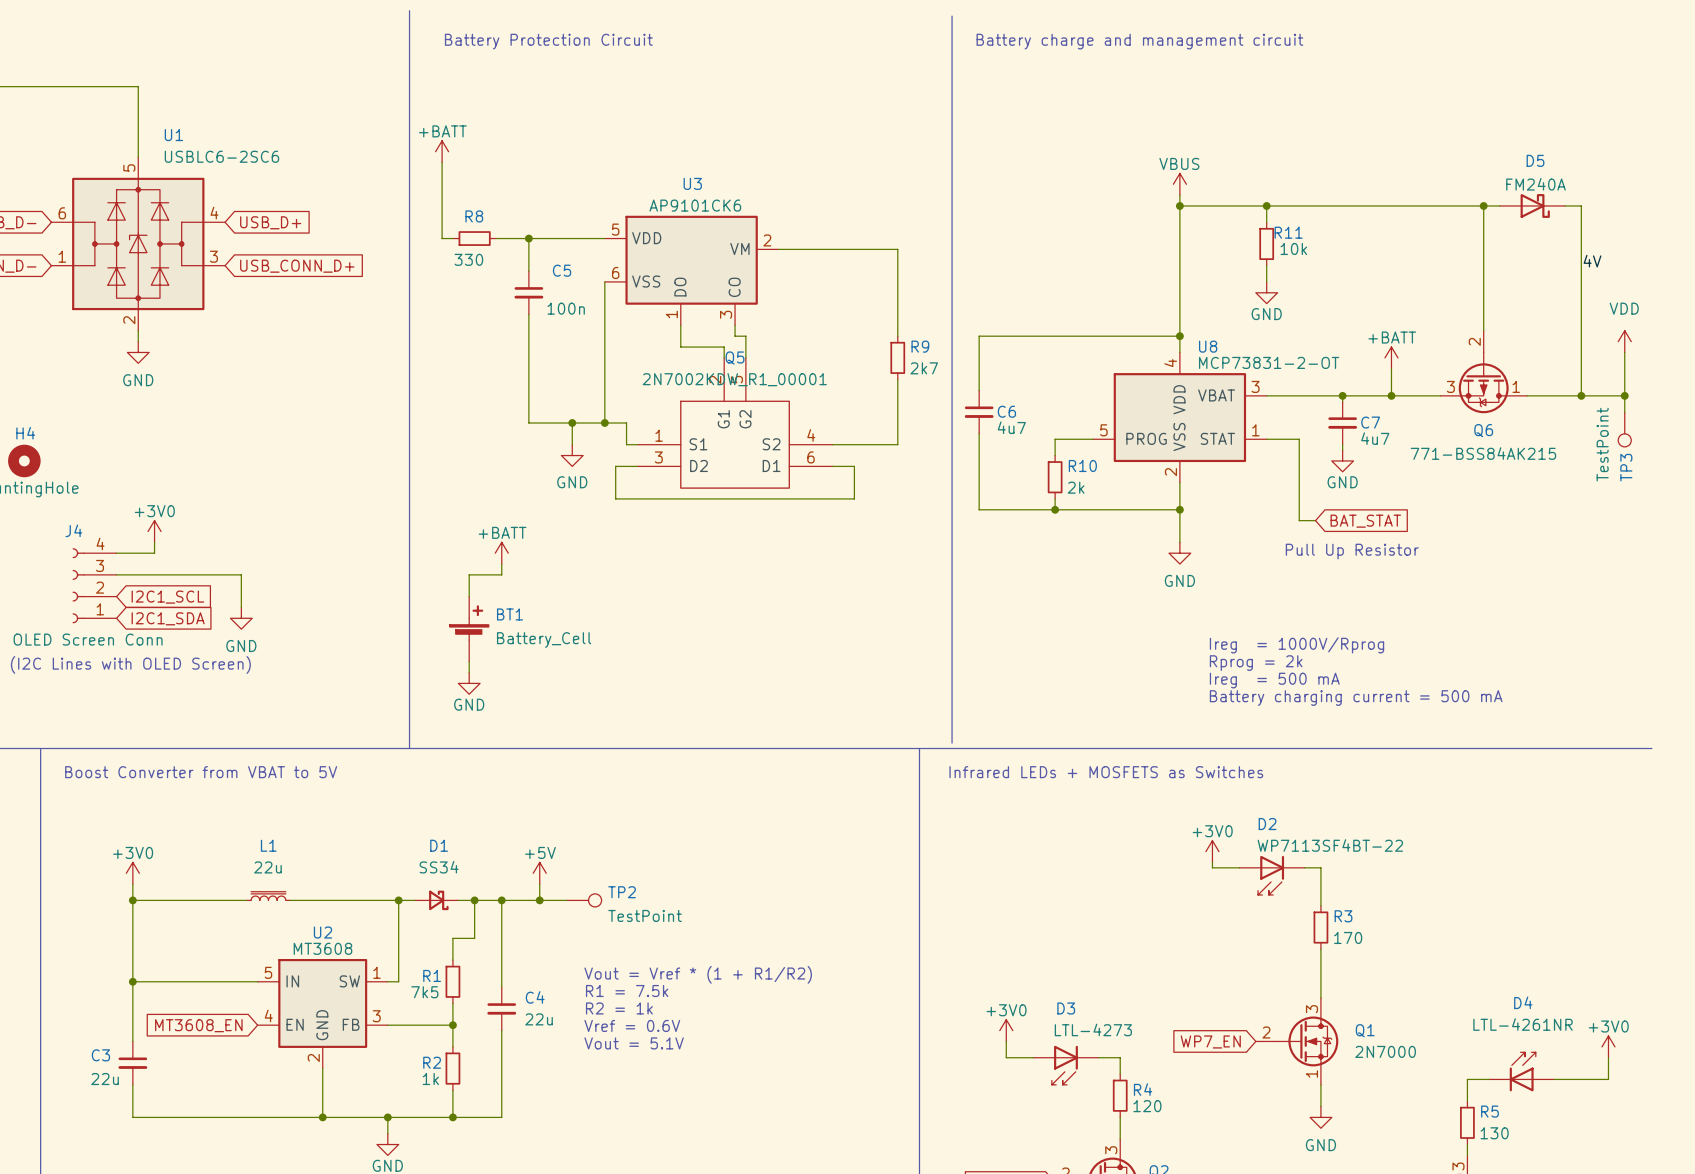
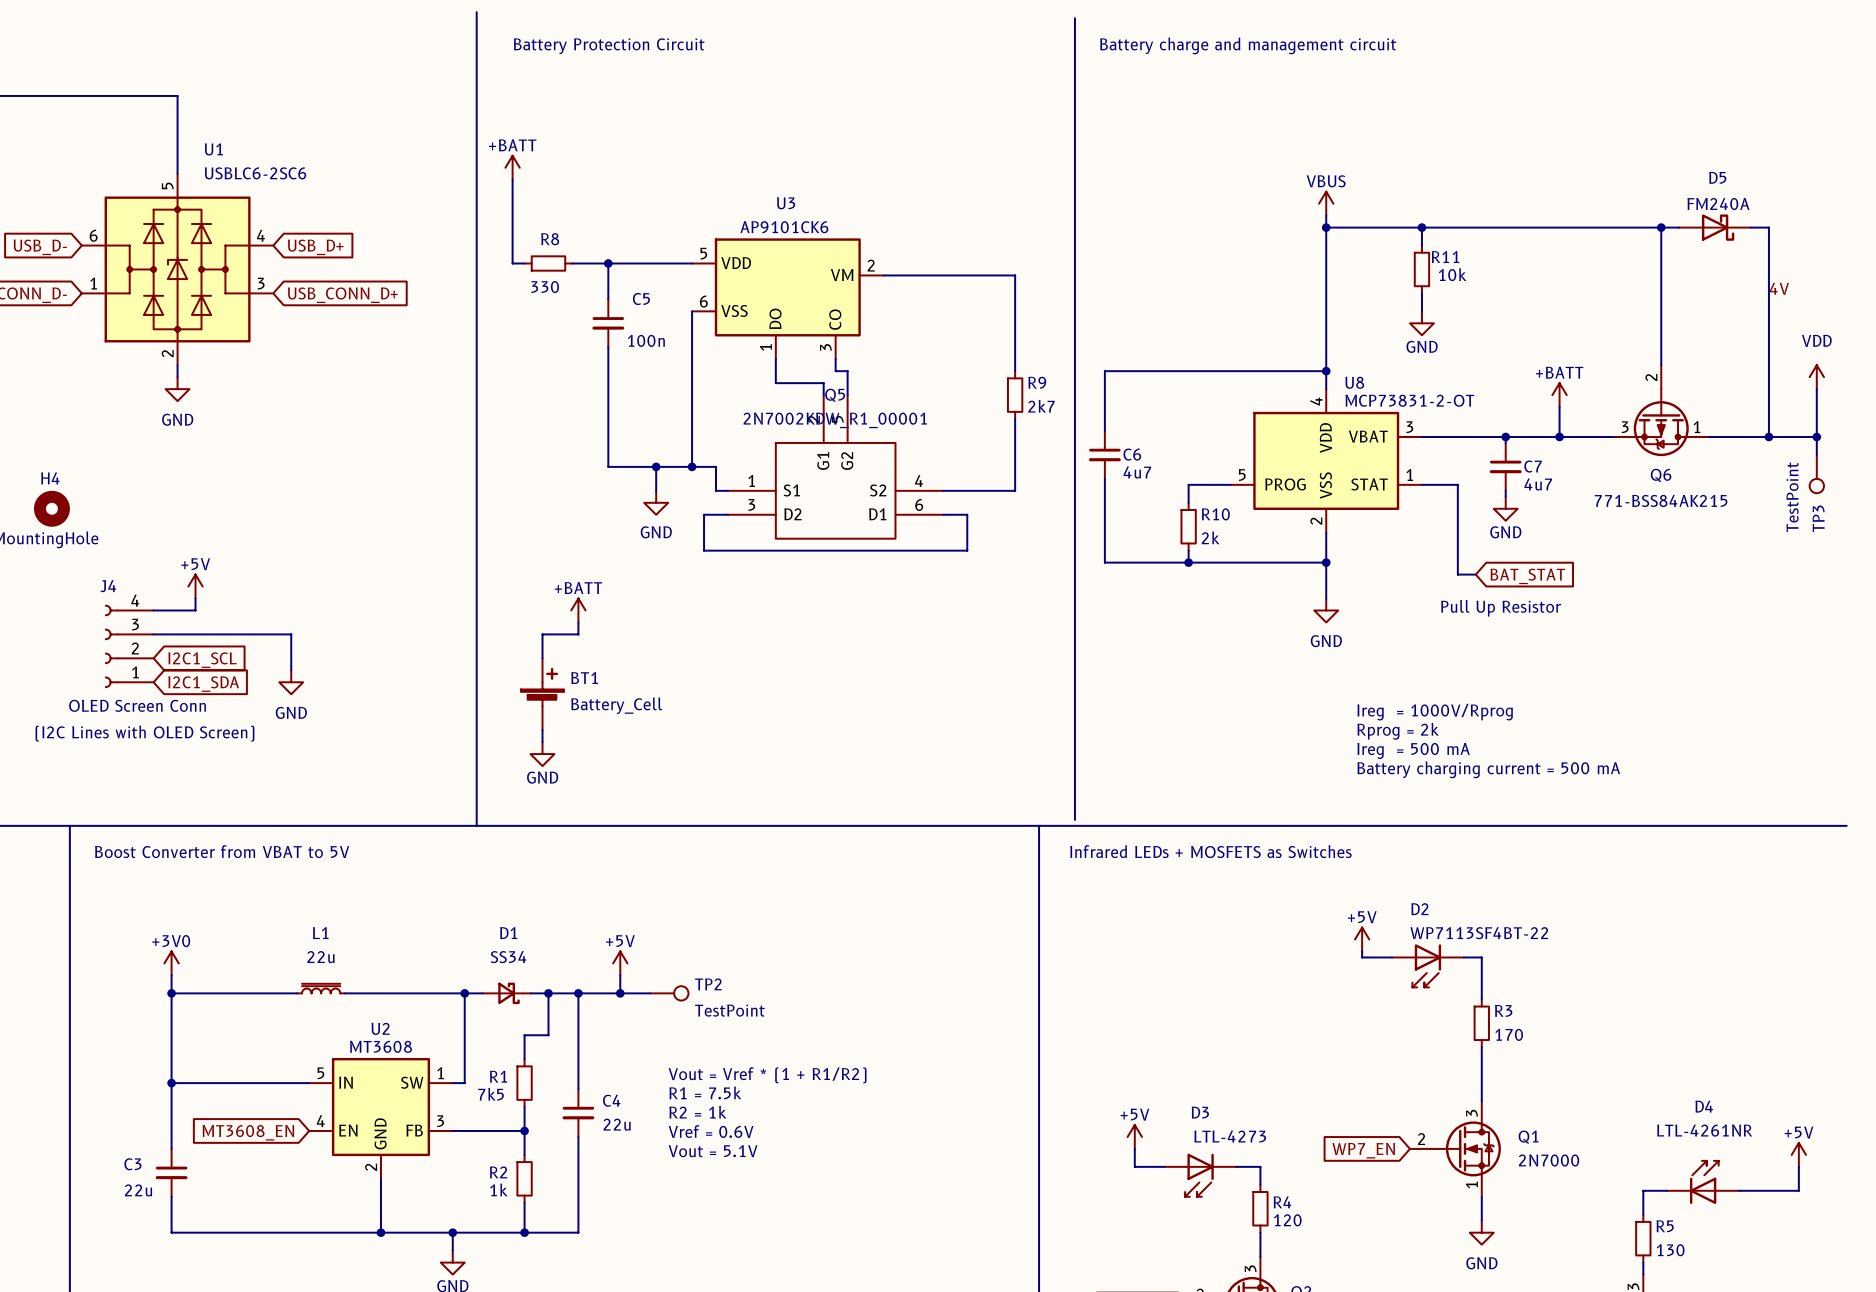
power symbol: +3V0 (154, 531) -> +5V (195, 586)
power symbol: +3V0 (1212, 851) -> +5V (1362, 939)
power symbol: +3V0 (1006, 1030) -> +5V (1134, 1136)
power symbol: +3V0 (1608, 1046) -> +5V (1798, 1154)

